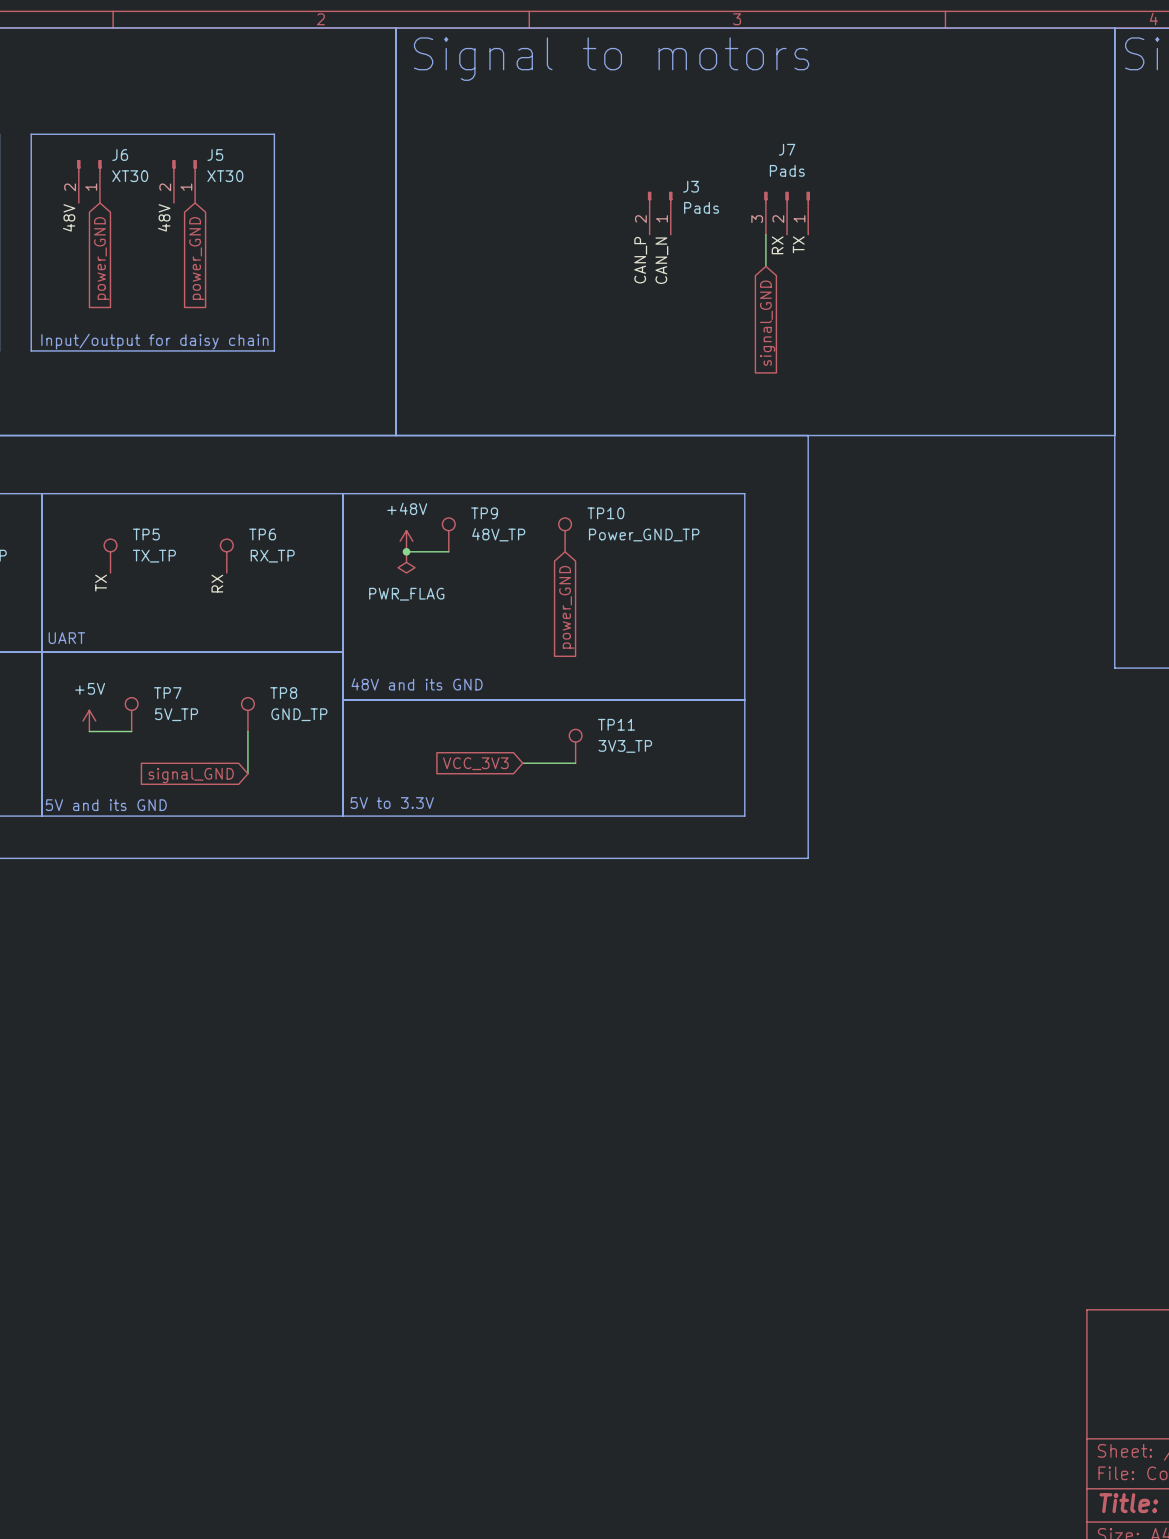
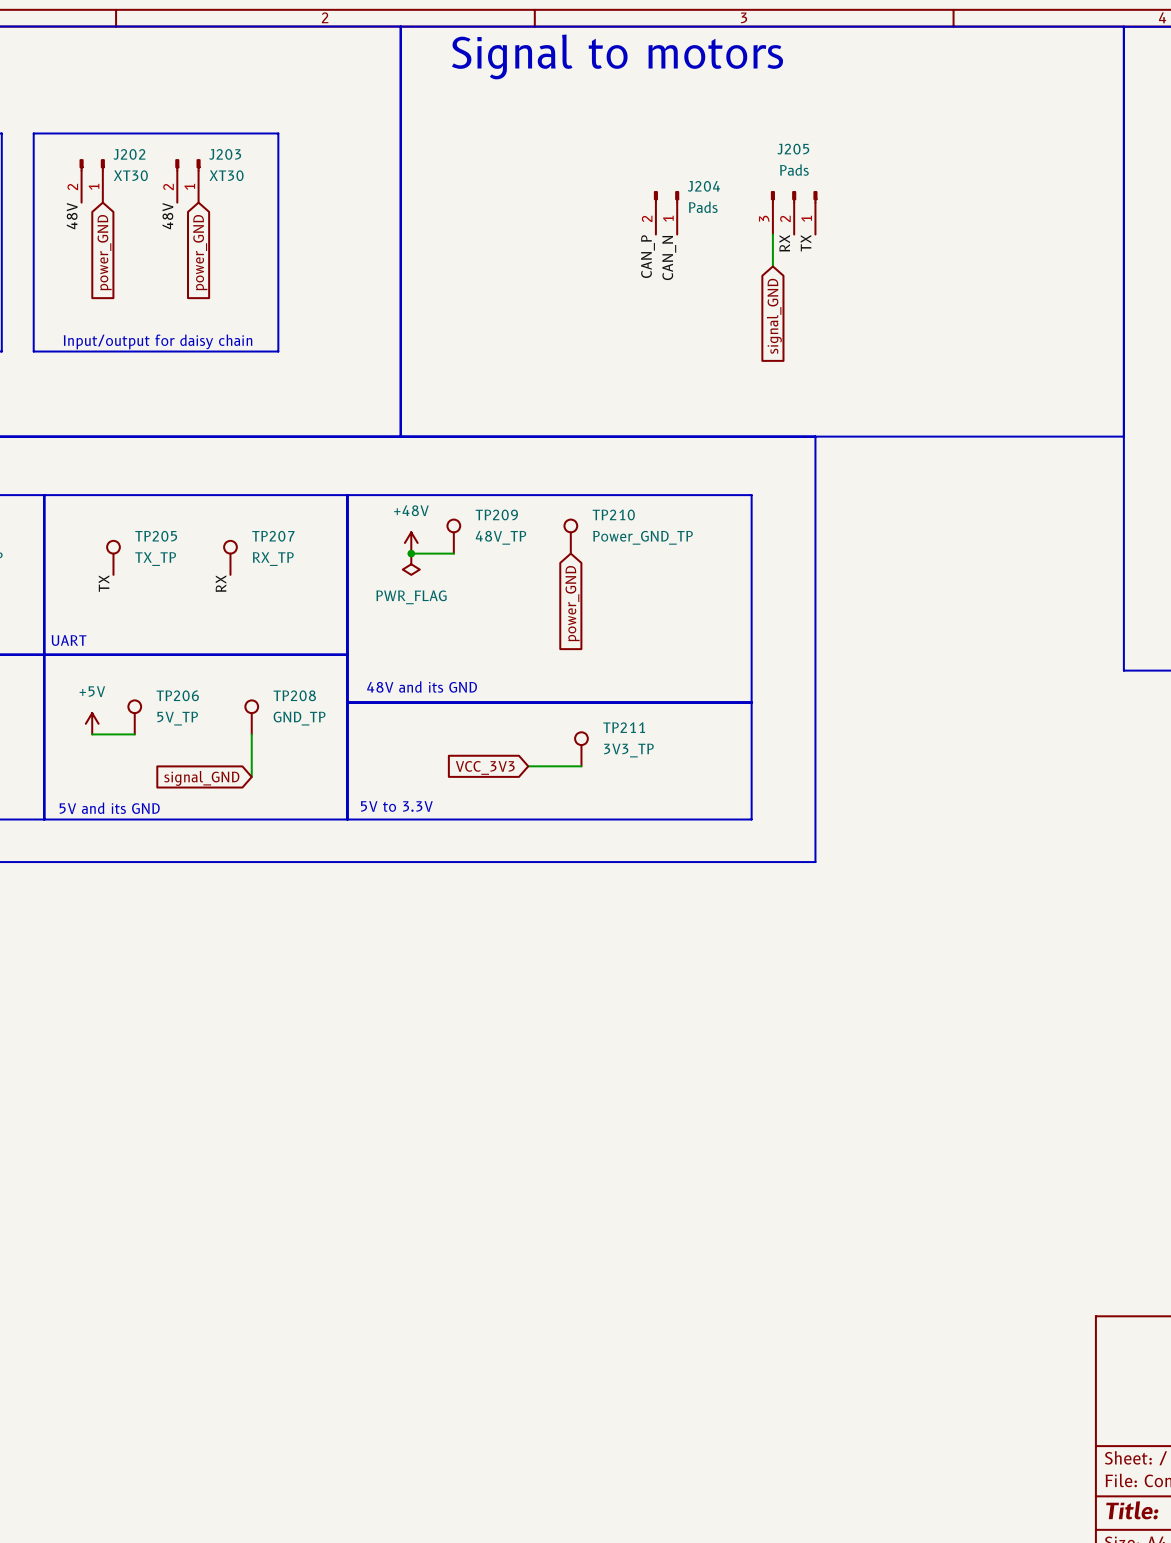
J7 name: J7 (787, 149) -> J205 (793, 149)
J6 name: J6 (120, 155) -> J202 (129, 154)
J5 name: J5 (215, 155) -> J203 (225, 154)
J3 name: J3 (690, 186) -> J204 (703, 186)
TP9 name: TP9 (484, 513) -> TP209 (496, 514)
TP10 name: TP10 (605, 513) -> TP210 (613, 514)
TP5 name: TP5 (146, 534) -> TP205 (156, 536)
TP6 name: TP6 (262, 534) -> TP207 (273, 536)
TP7 name: TP7 (167, 693) -> TP206 (177, 695)
TP8 name: TP8 (283, 693) -> TP208 (294, 695)
TP11 name: TP11 (616, 724) -> TP211 (624, 727)

